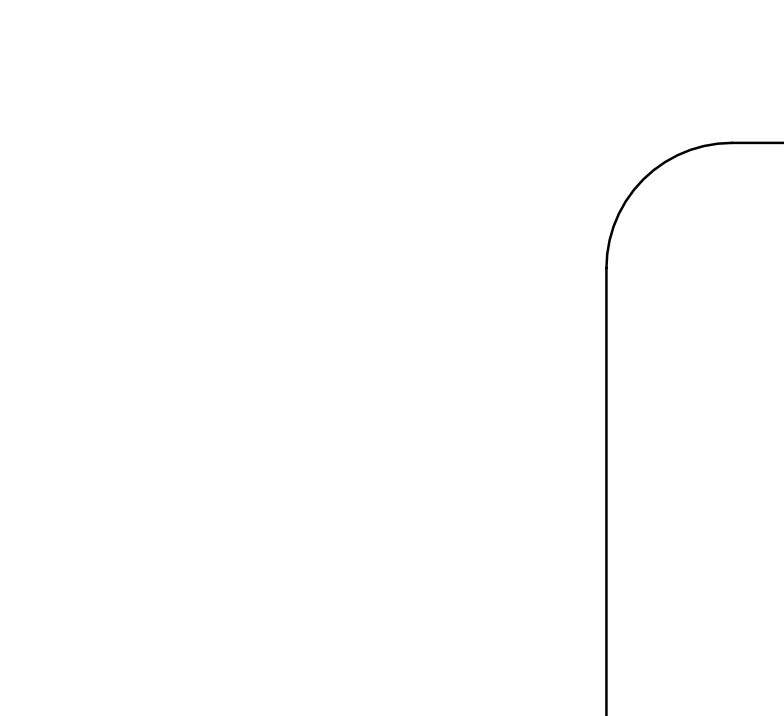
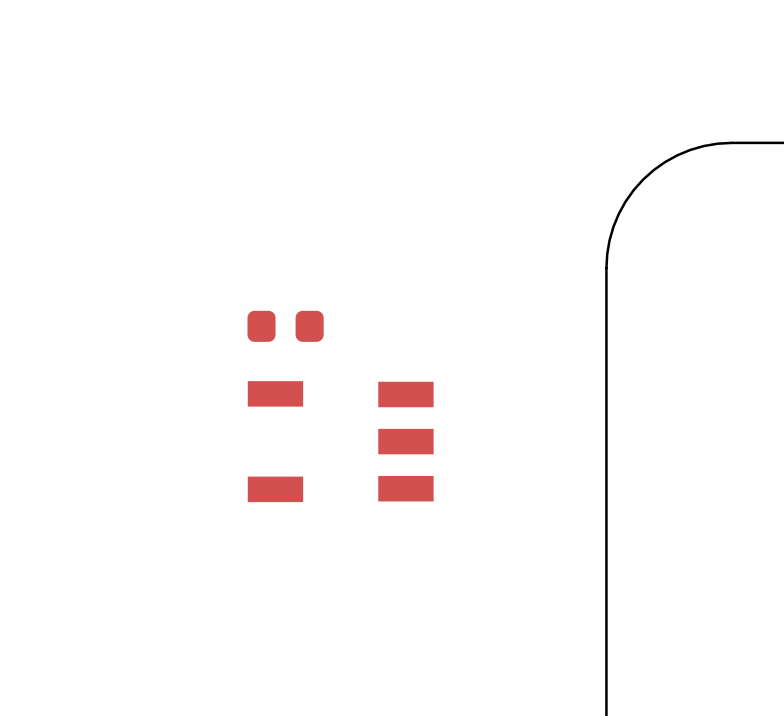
part: none -> (285, 326)
part: none -> (340, 441)

